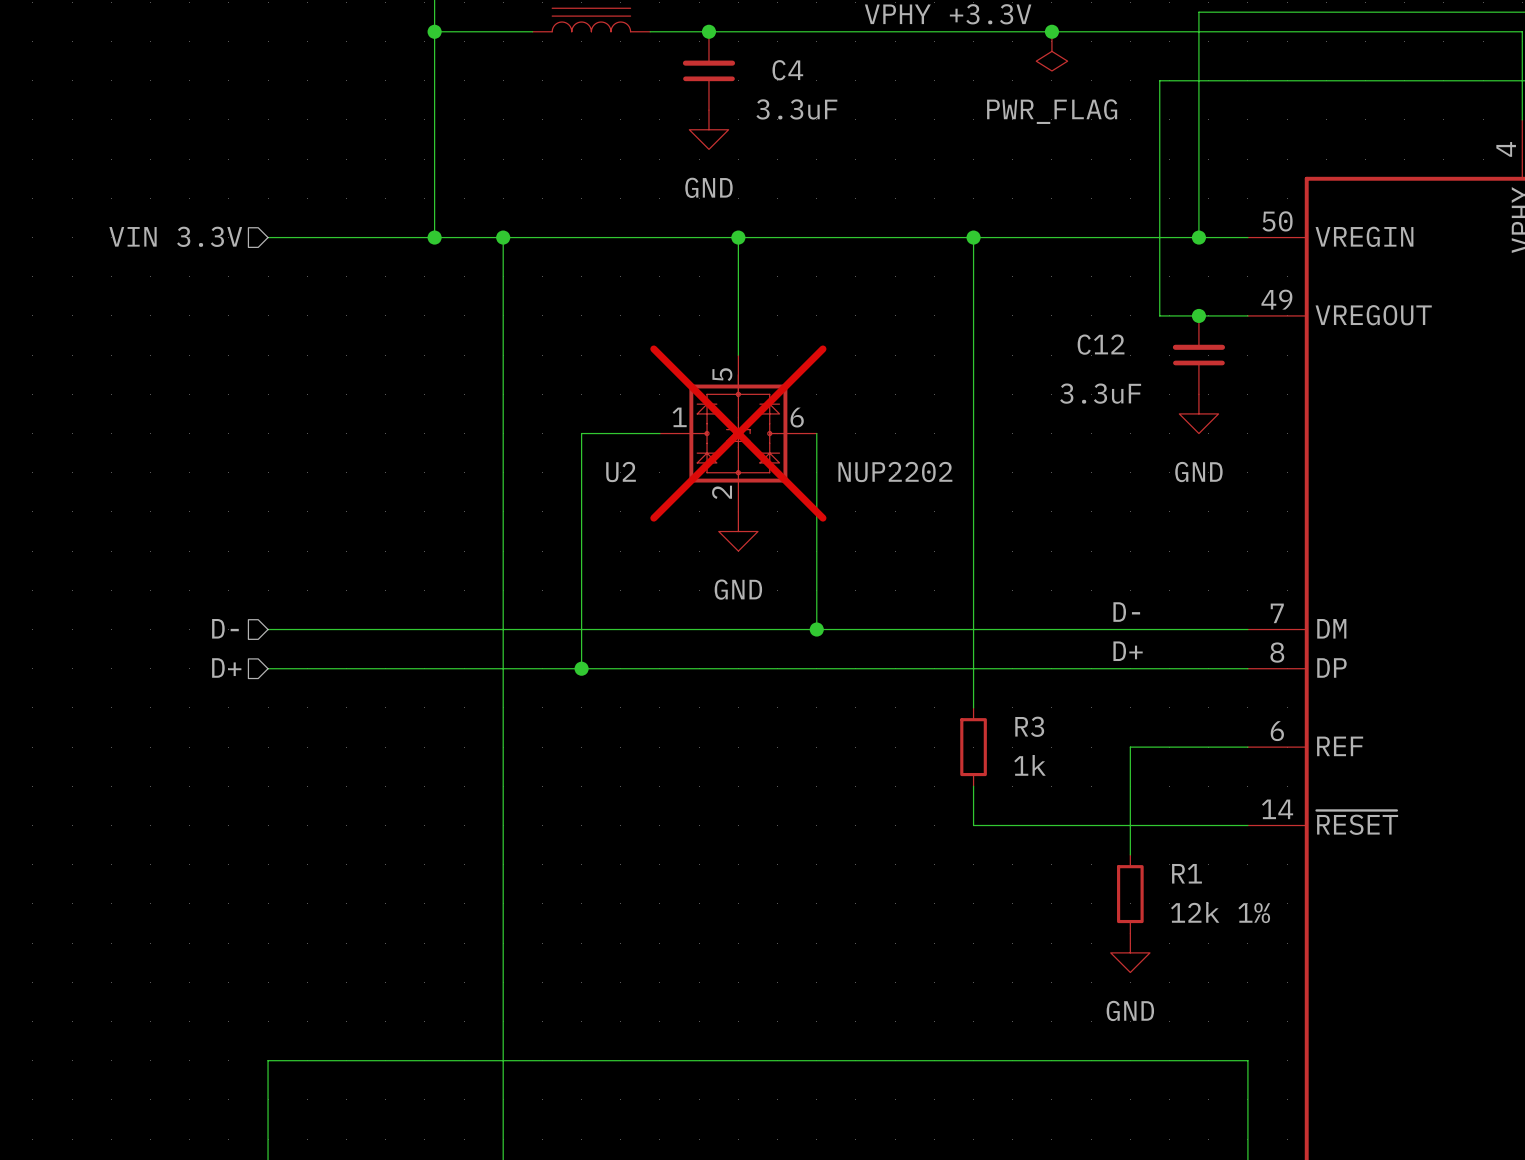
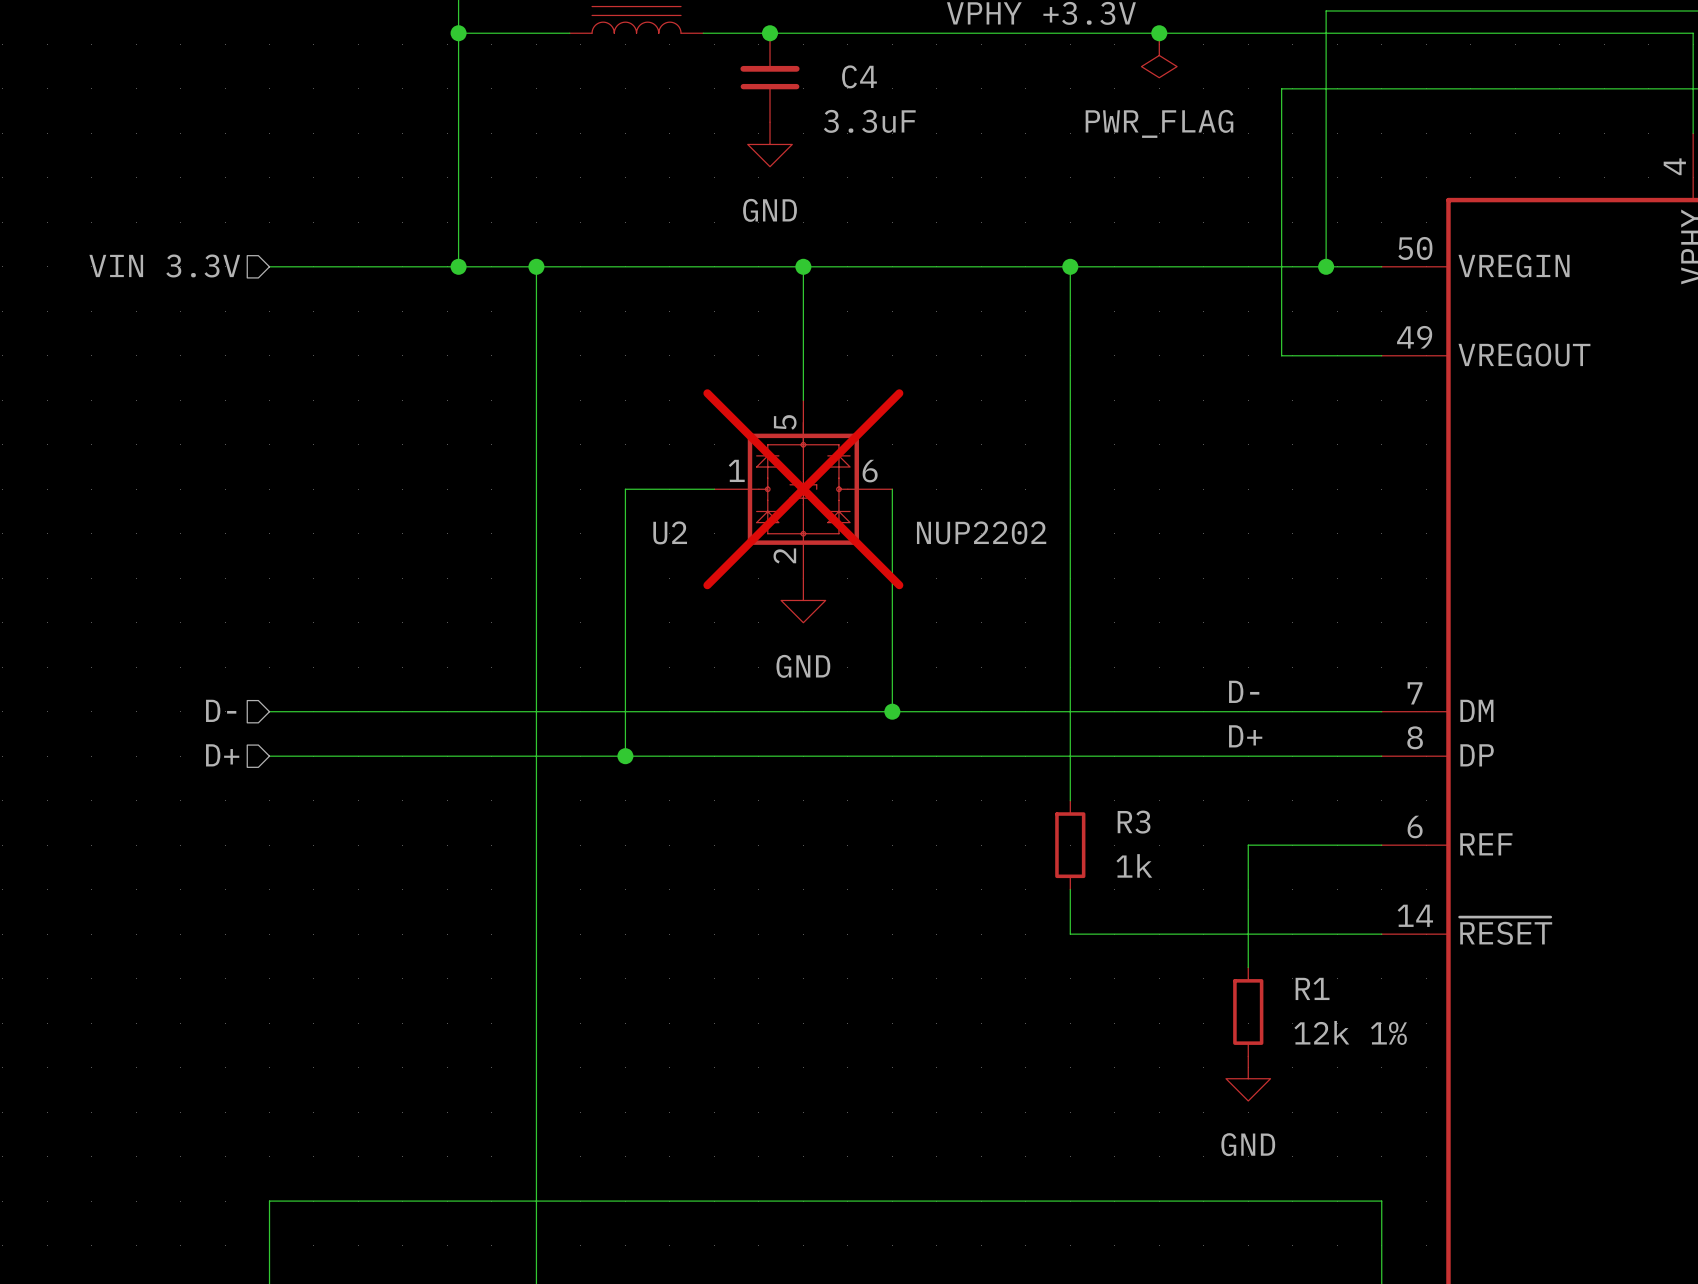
junction: (1198, 315) -> none
C12: 3.3uF (1198, 355) -> none
power symbol: GND (1198, 413) -> none

